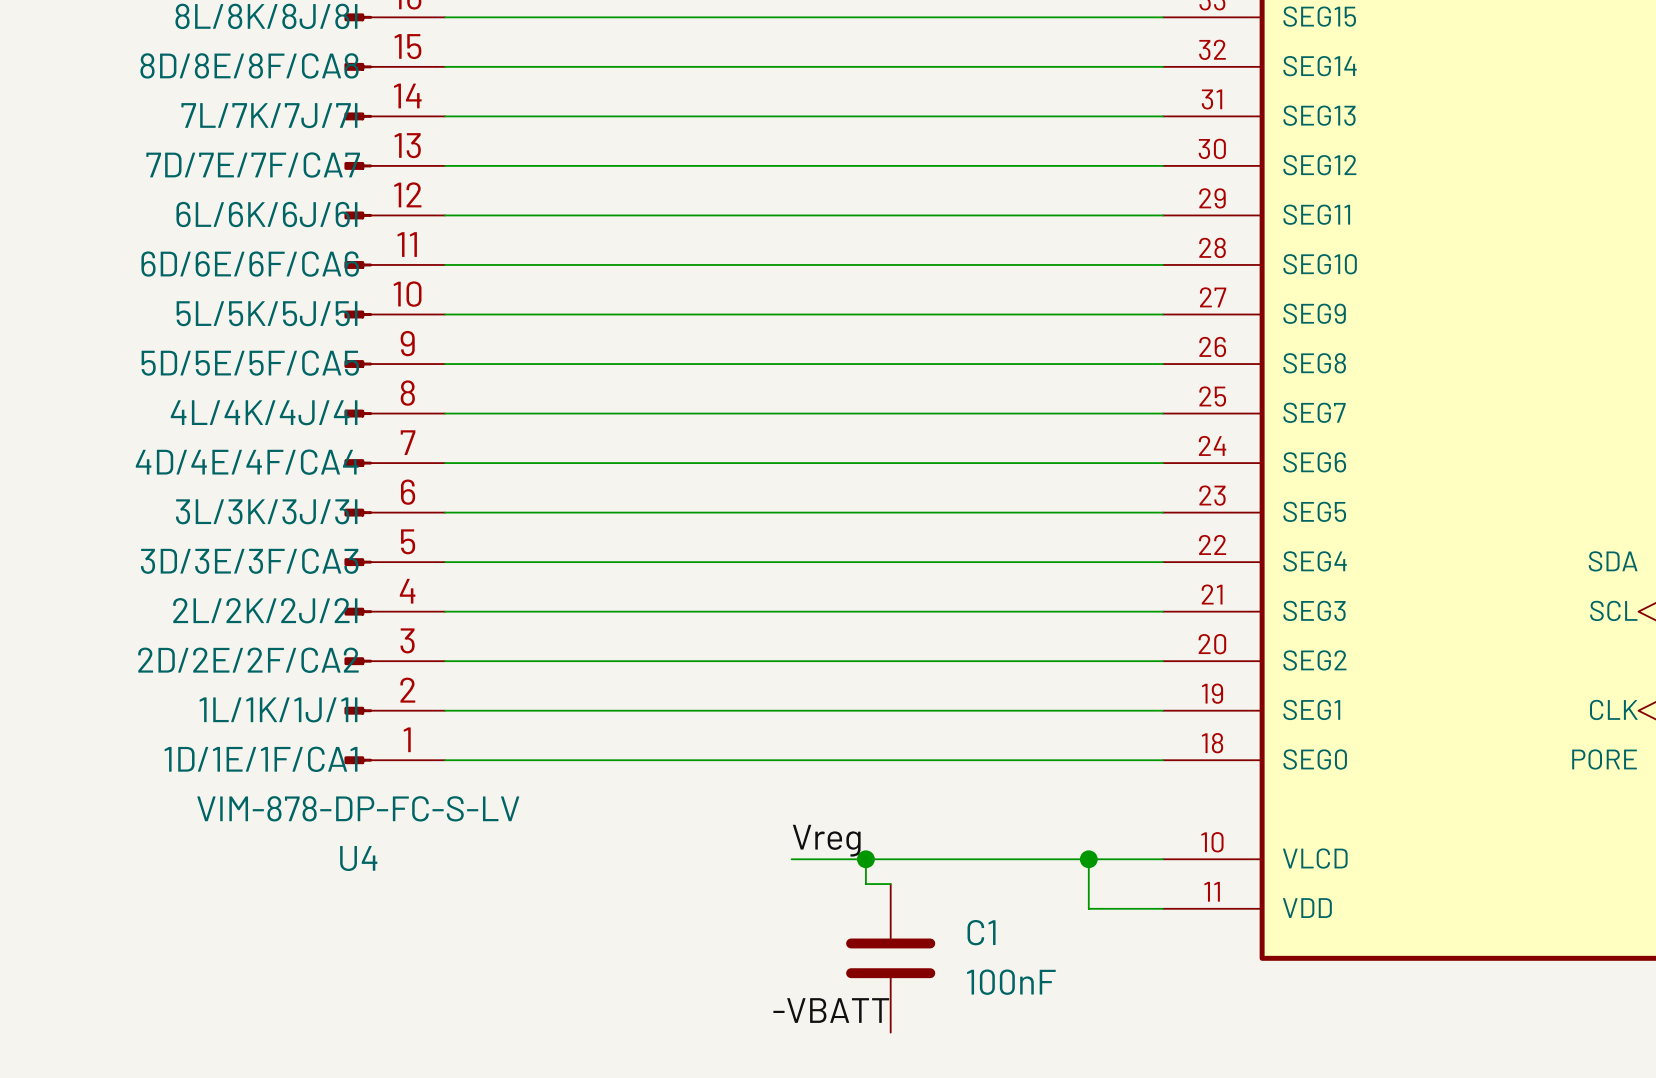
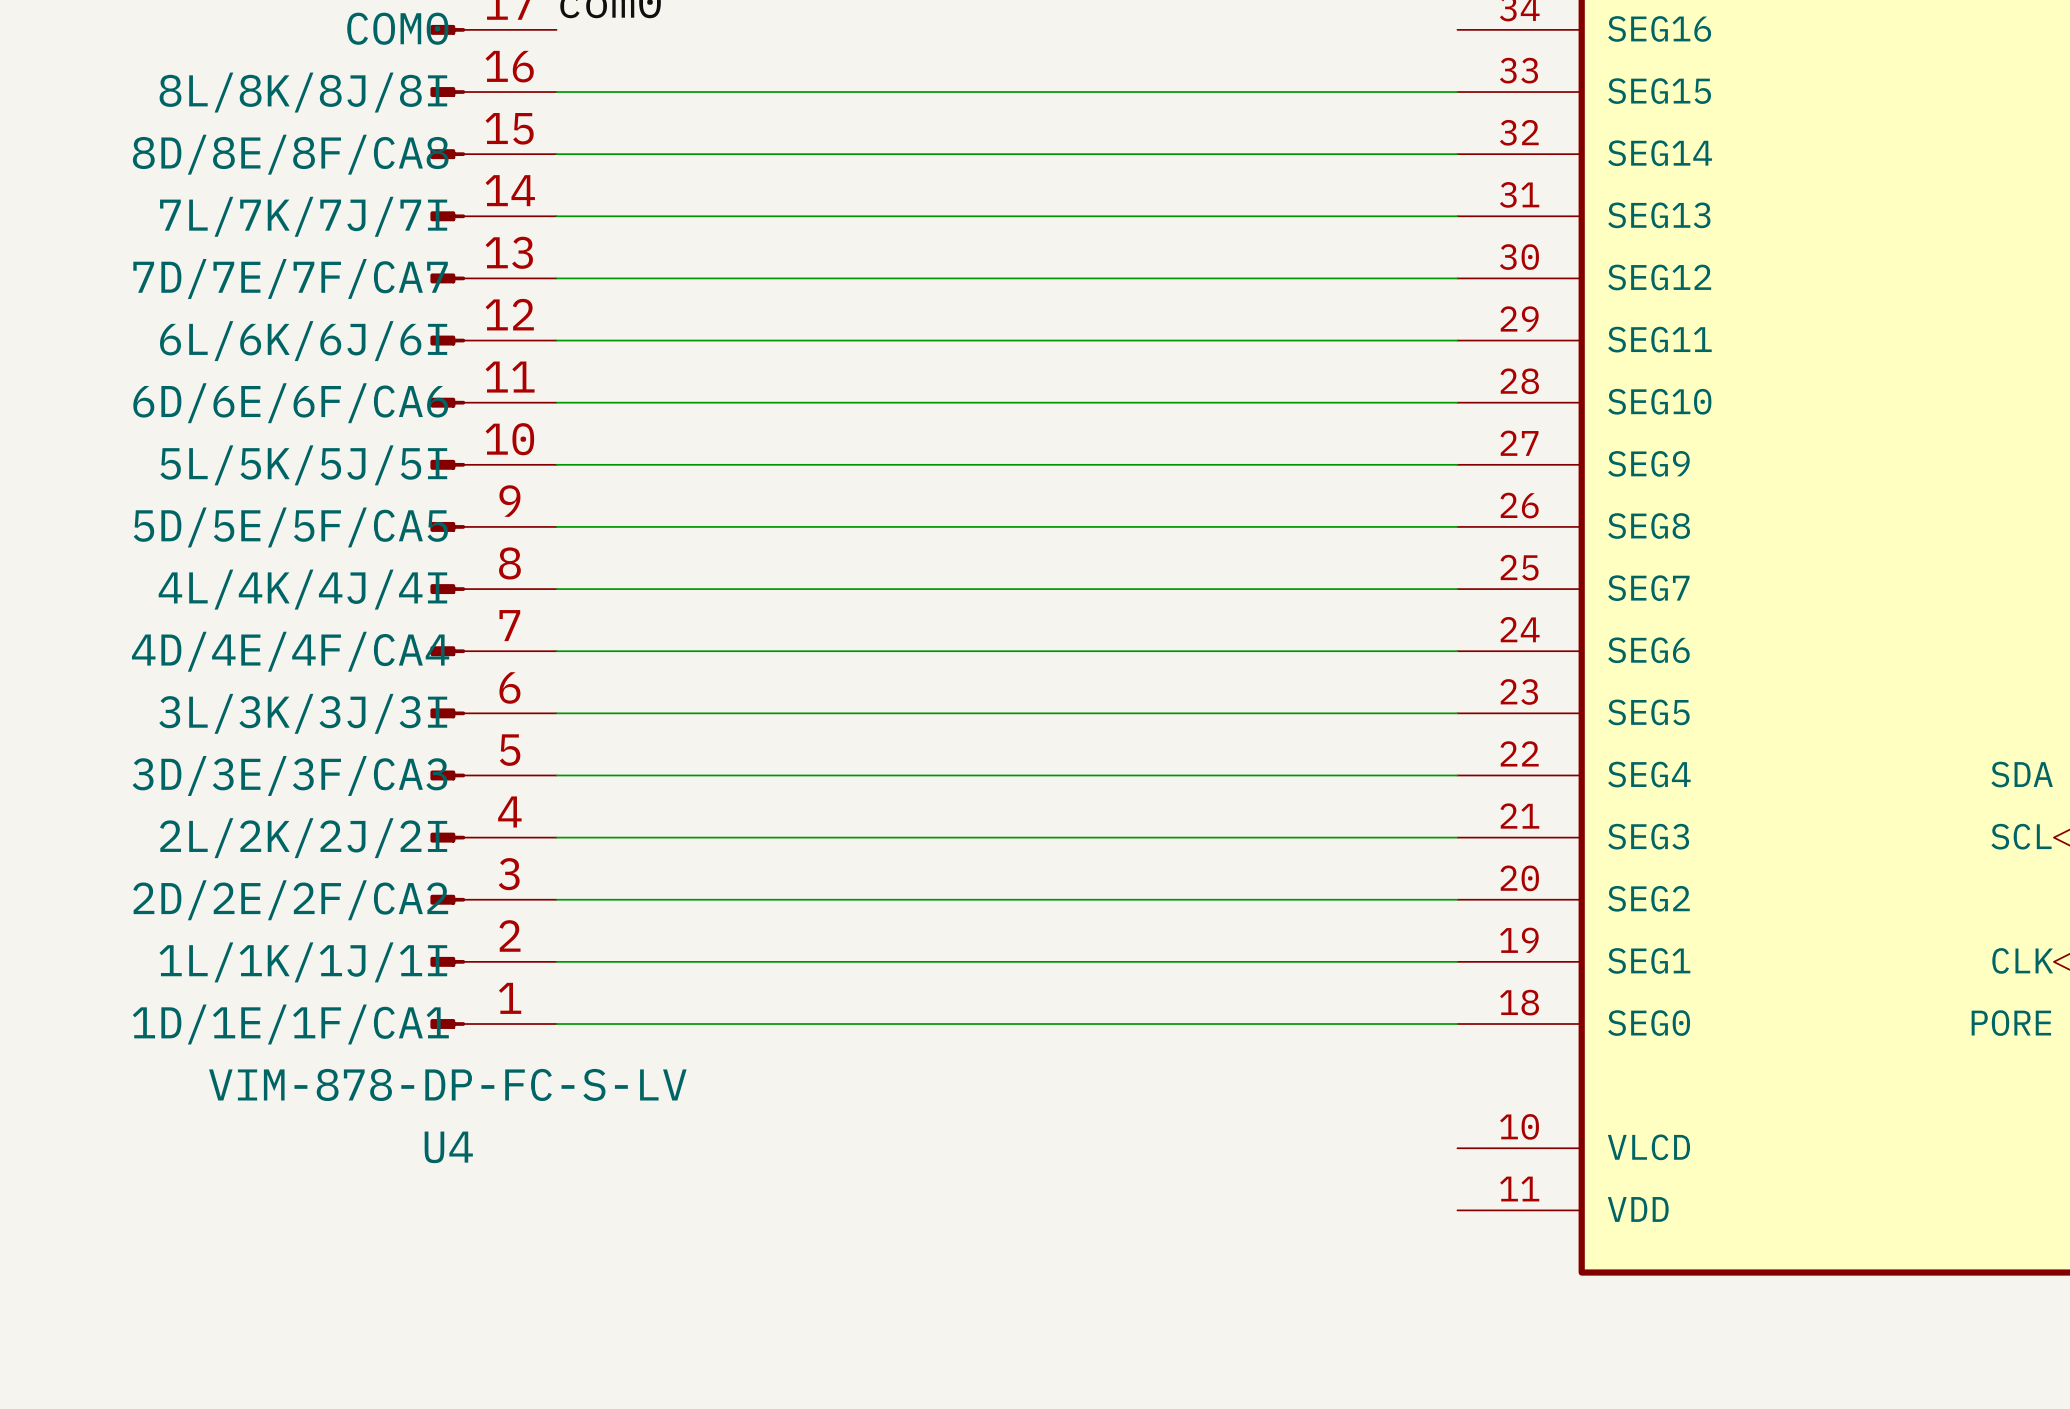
label: Vreg (826, 840) -> none
wire: (791, 859) (1163, 859) -> none
wire: (865, 859) (865, 884) (890, 884) -> none
junction: (865, 859) -> none
wire: (1088, 859) (1088, 908) (1163, 908) -> none
junction: (1088, 859) -> none
C1: 100nF (890, 958) -> none
label: -VBATT (831, 1010) -> none

